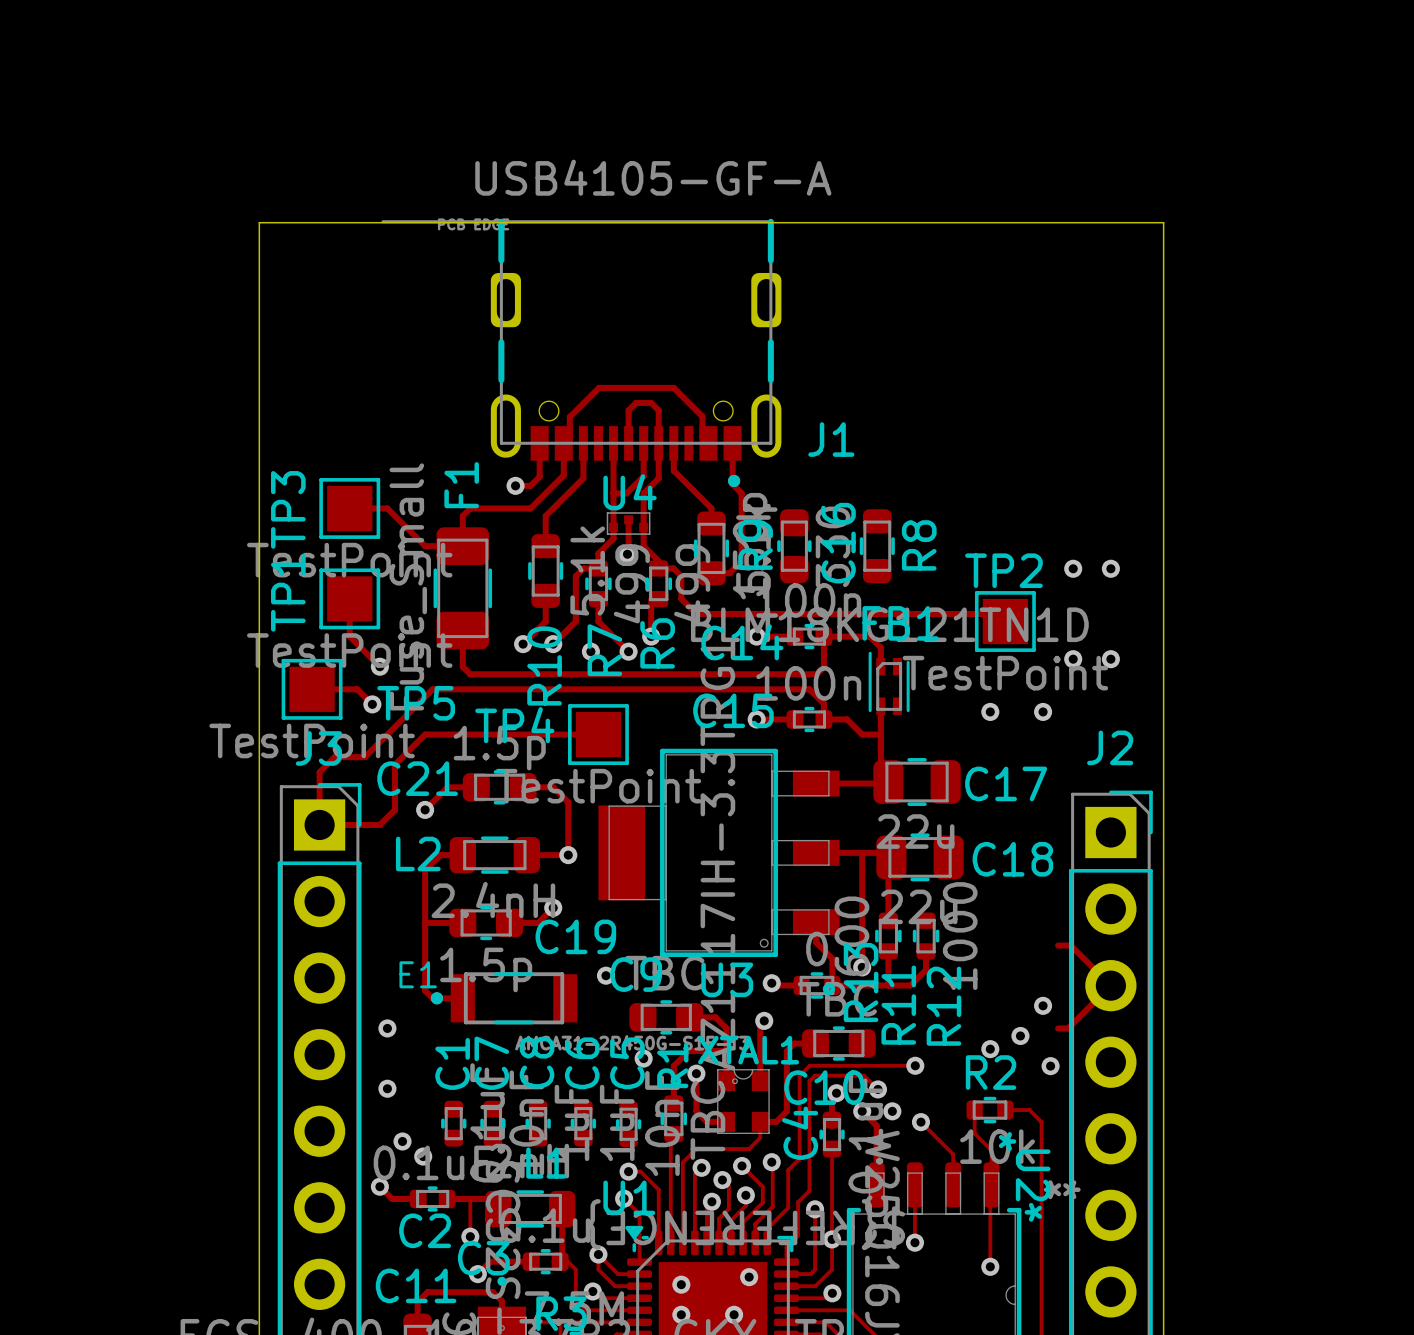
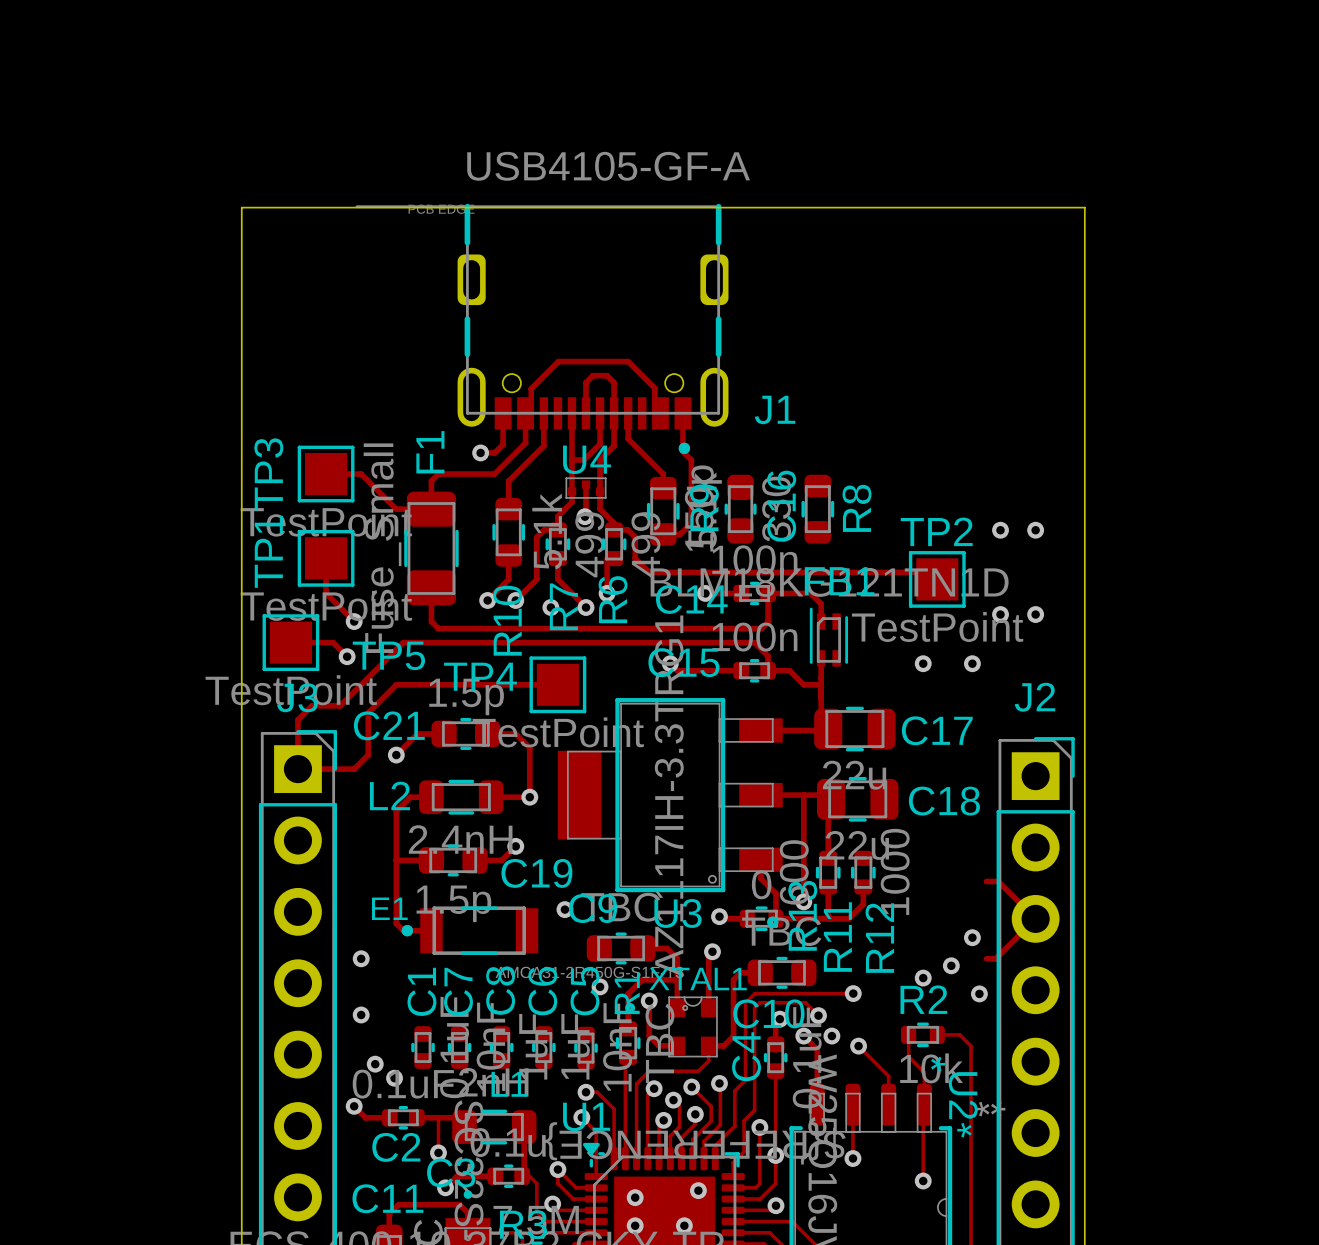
track: none -> (670, 663) (677, 670) (705, 670)
via position: (756, 719) -> (670, 663)

